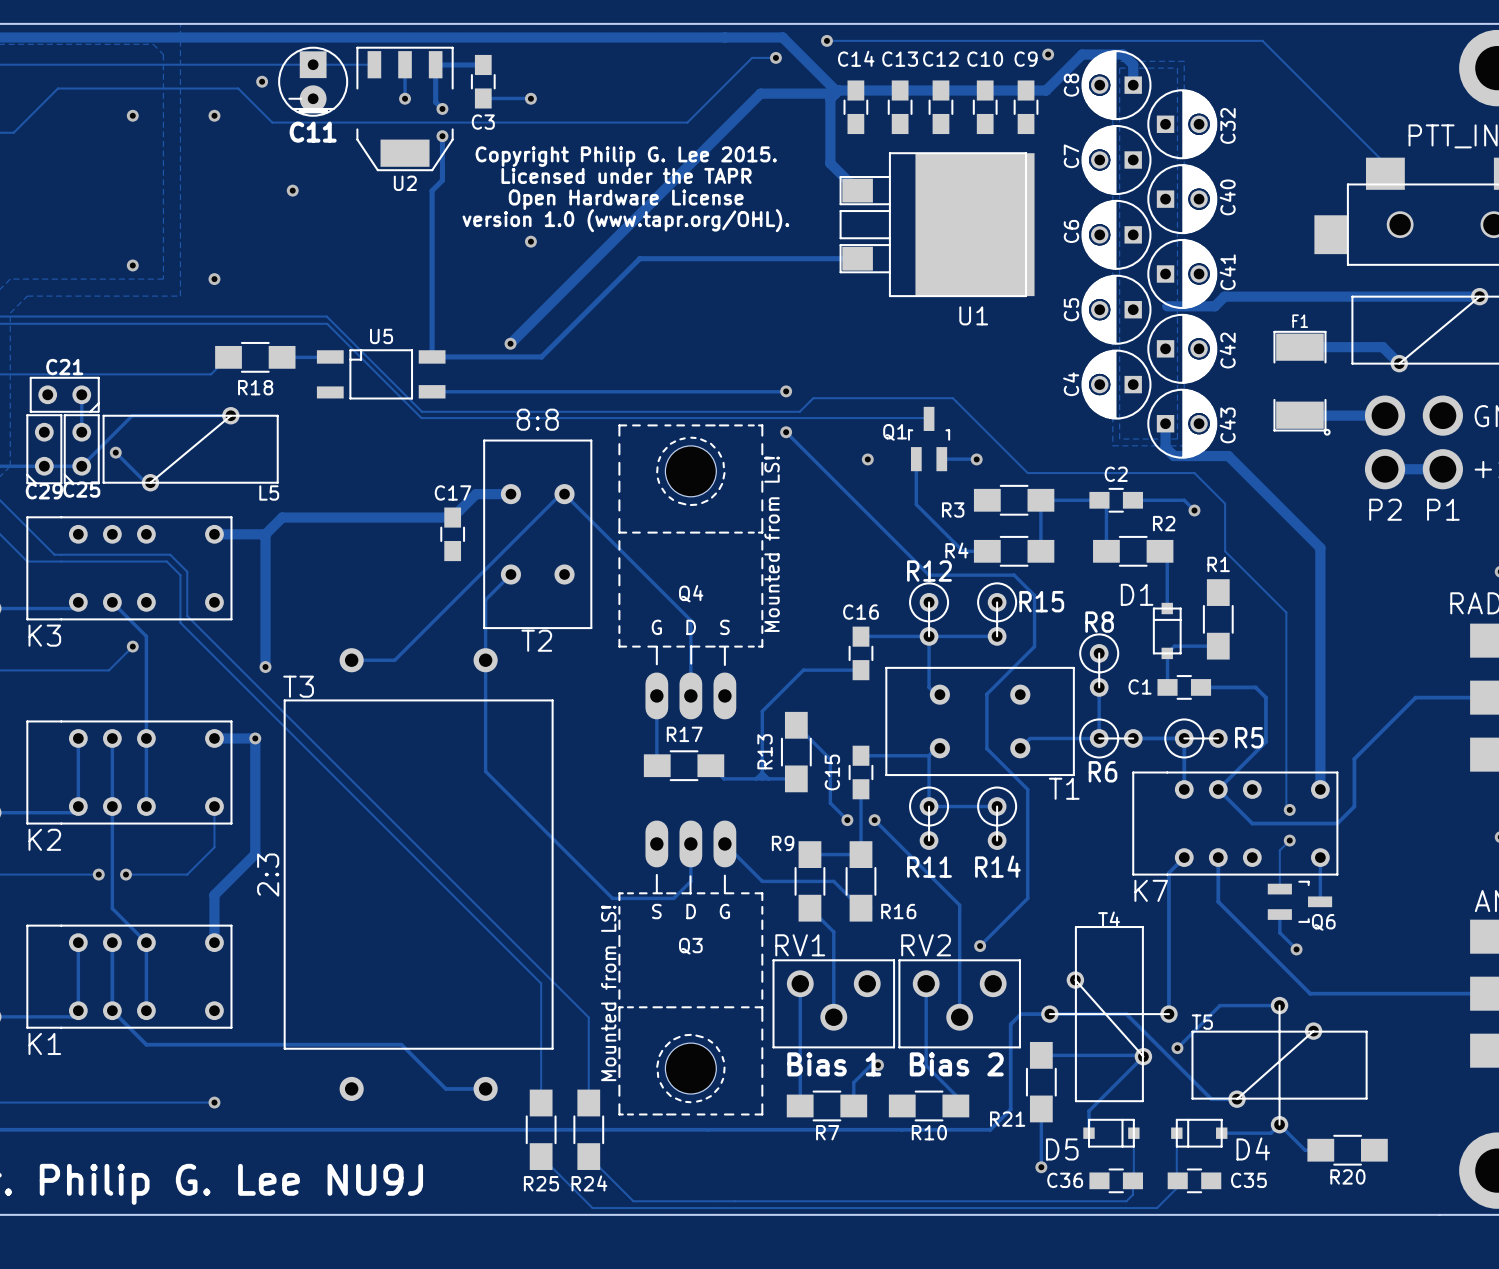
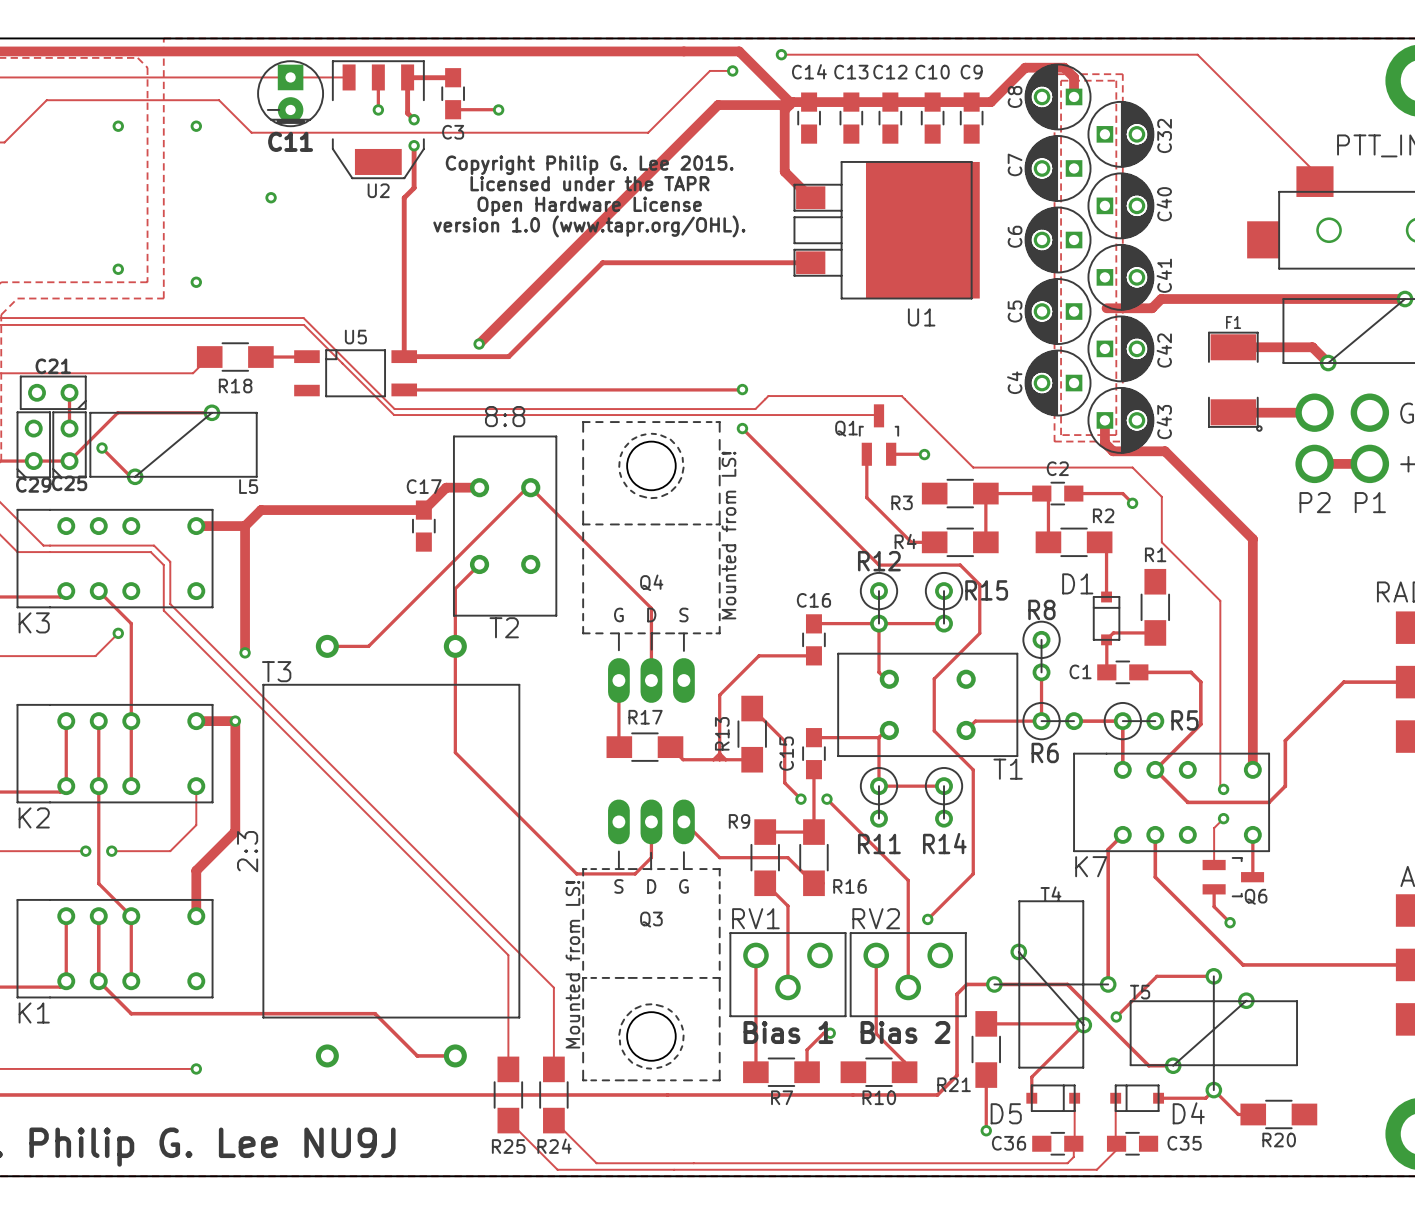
via: (1048, 54) -> none
via: (262, 81) -> none
via: (530, 241) -> none
via: (867, 459) -> none

